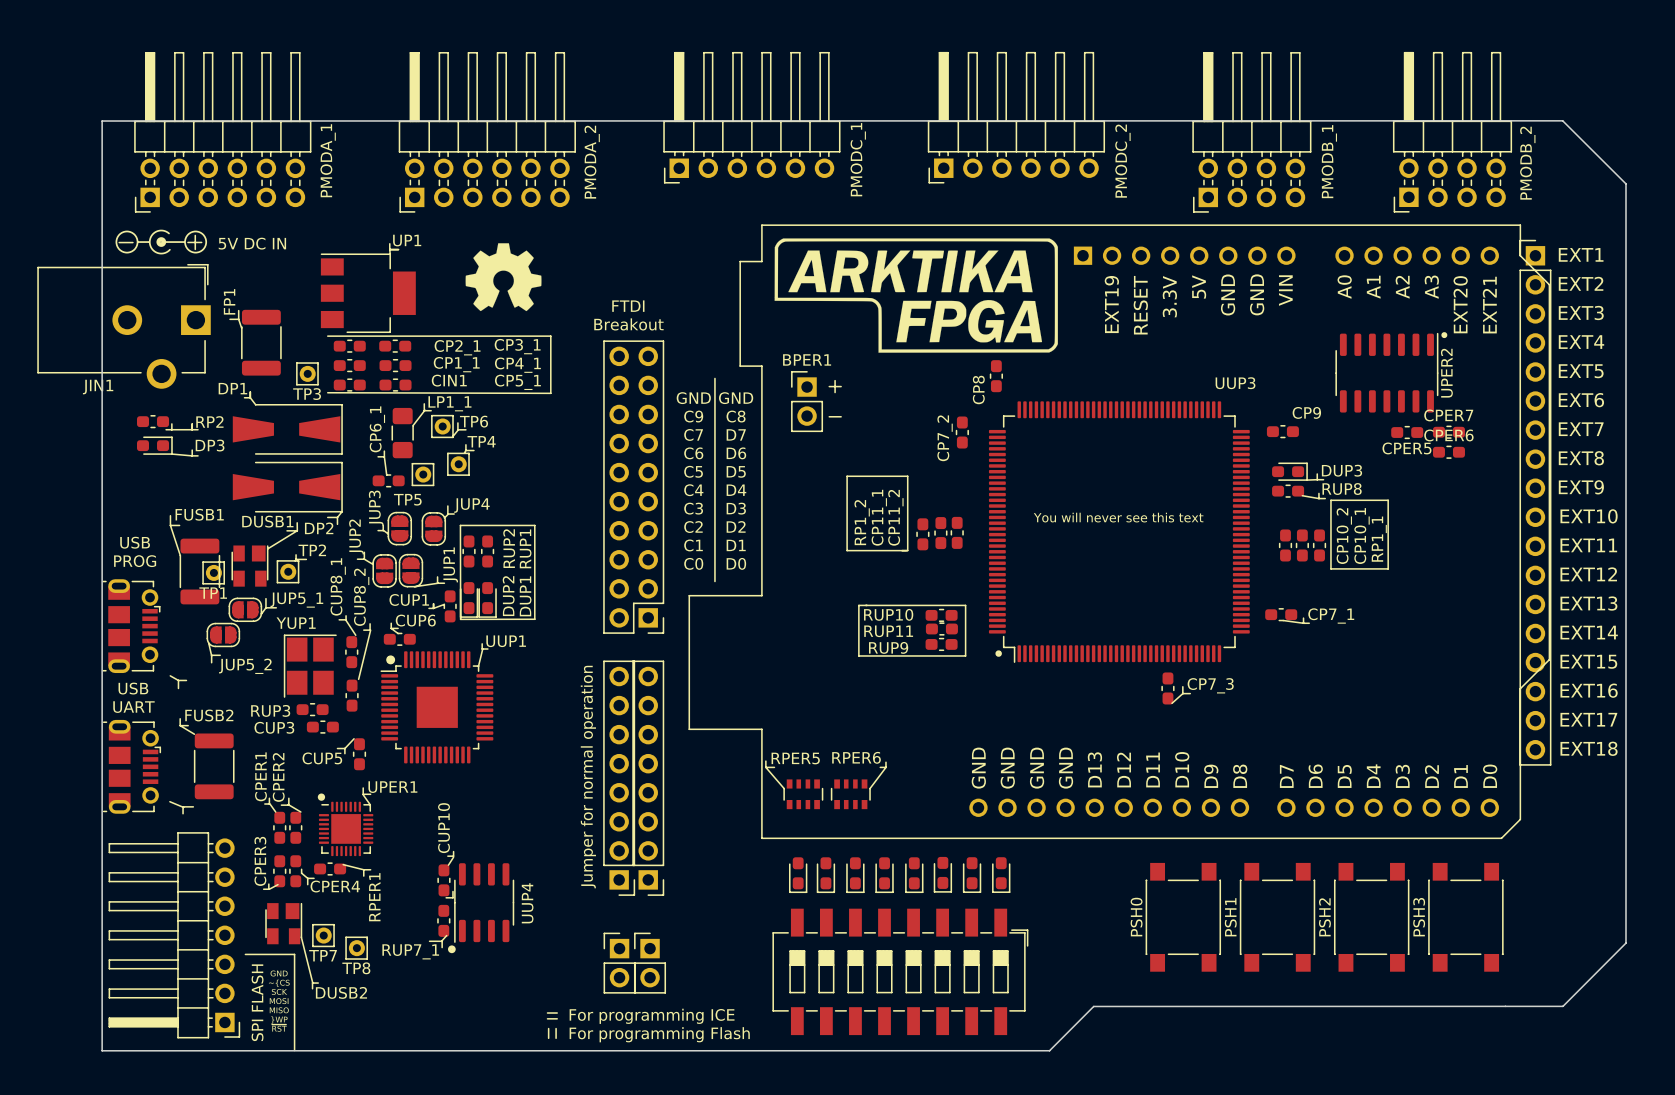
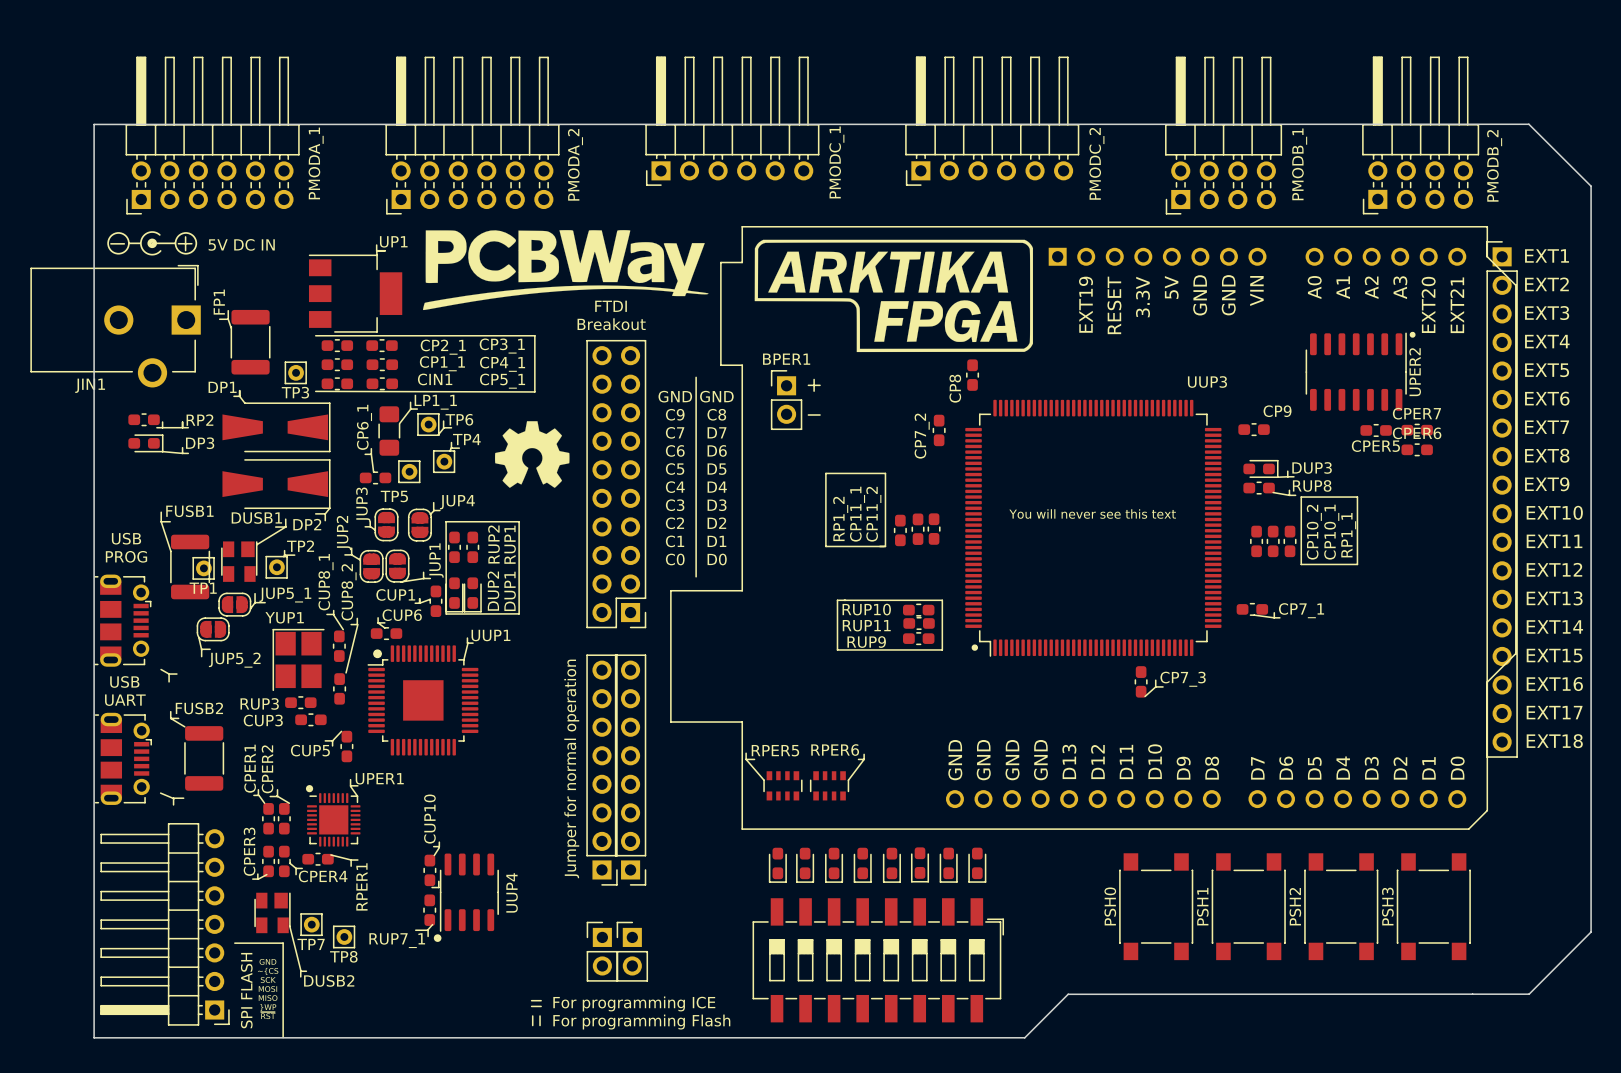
drawing: none -> [422, 230, 709, 311]
drawing position: (503, 277) -> (532, 454)

